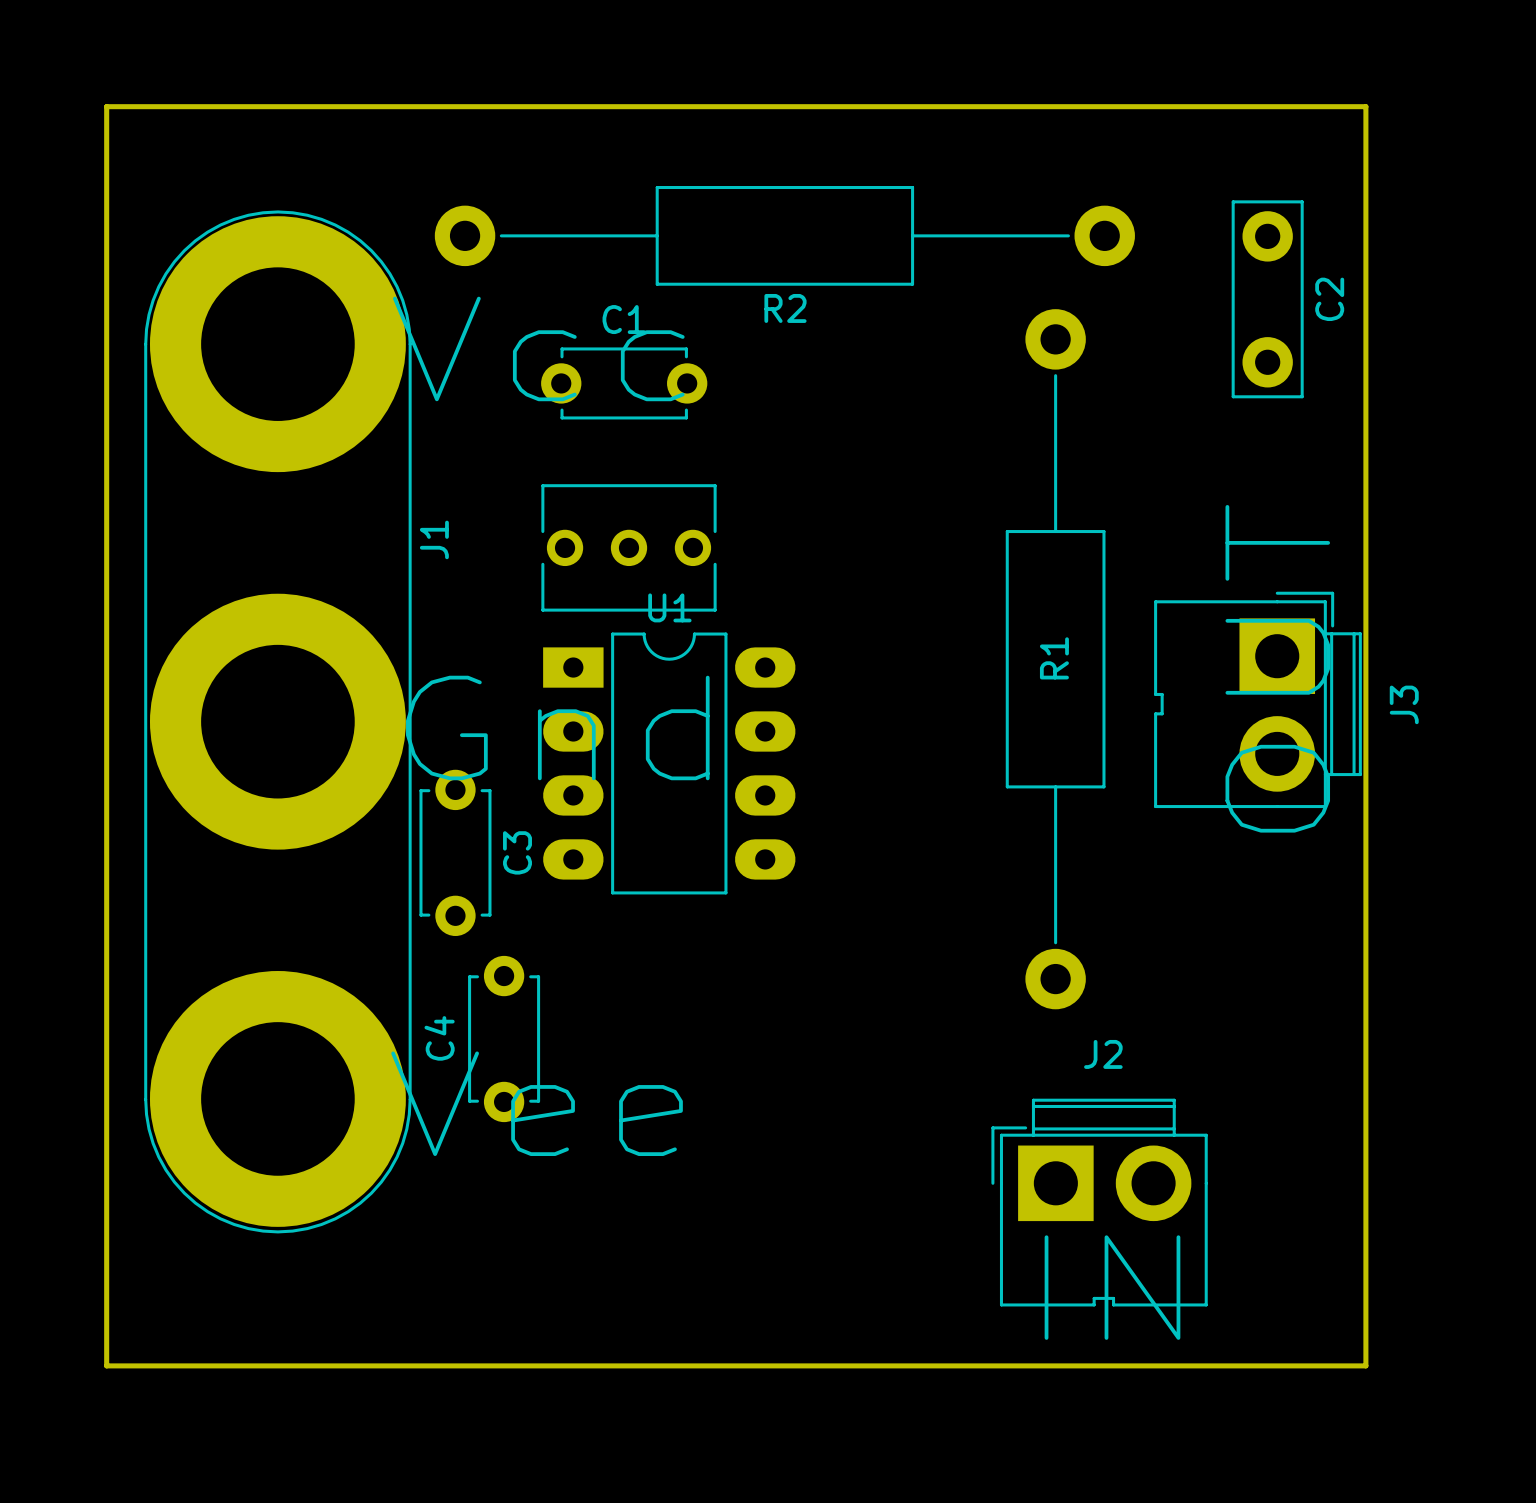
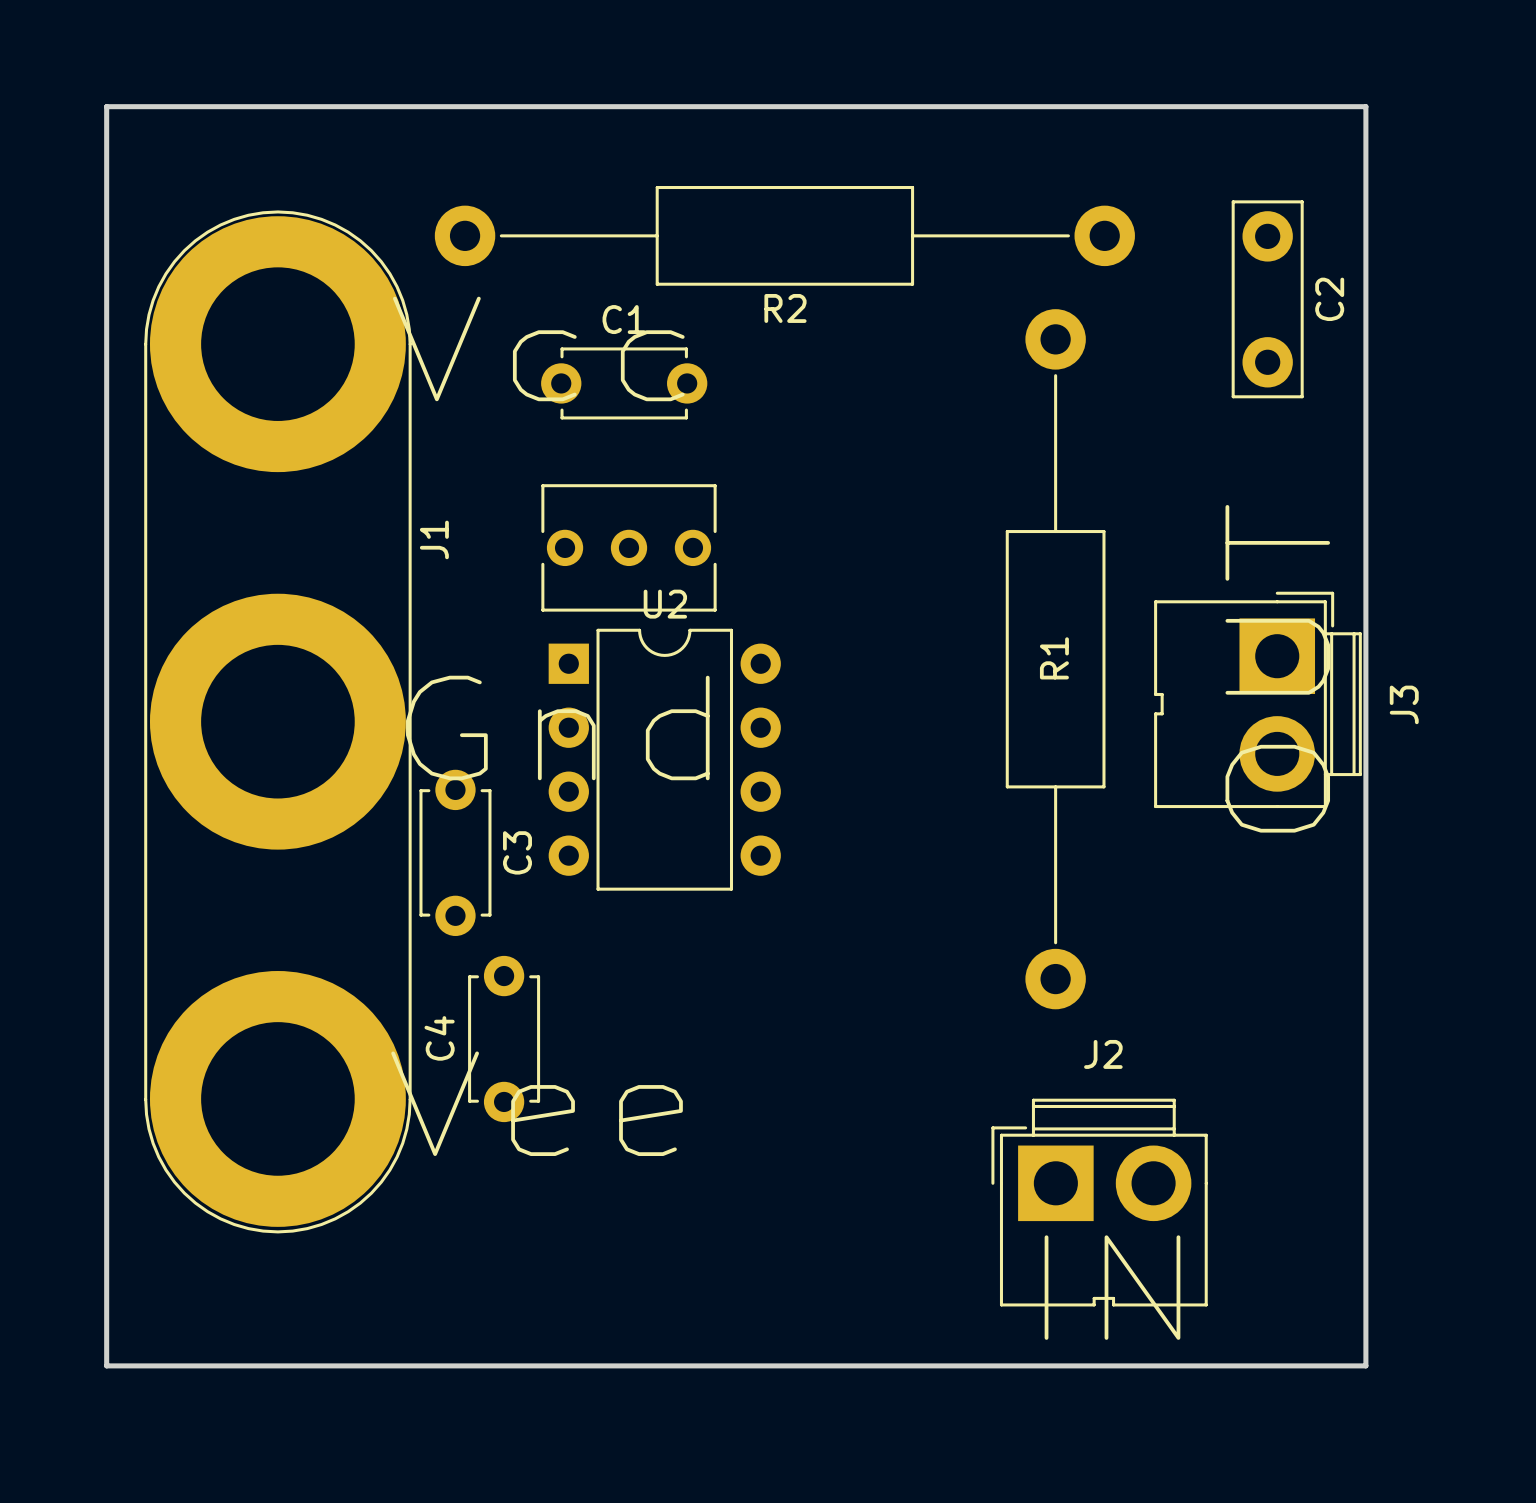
U2: none -> (664, 759)
U1: (669, 763) -> none

